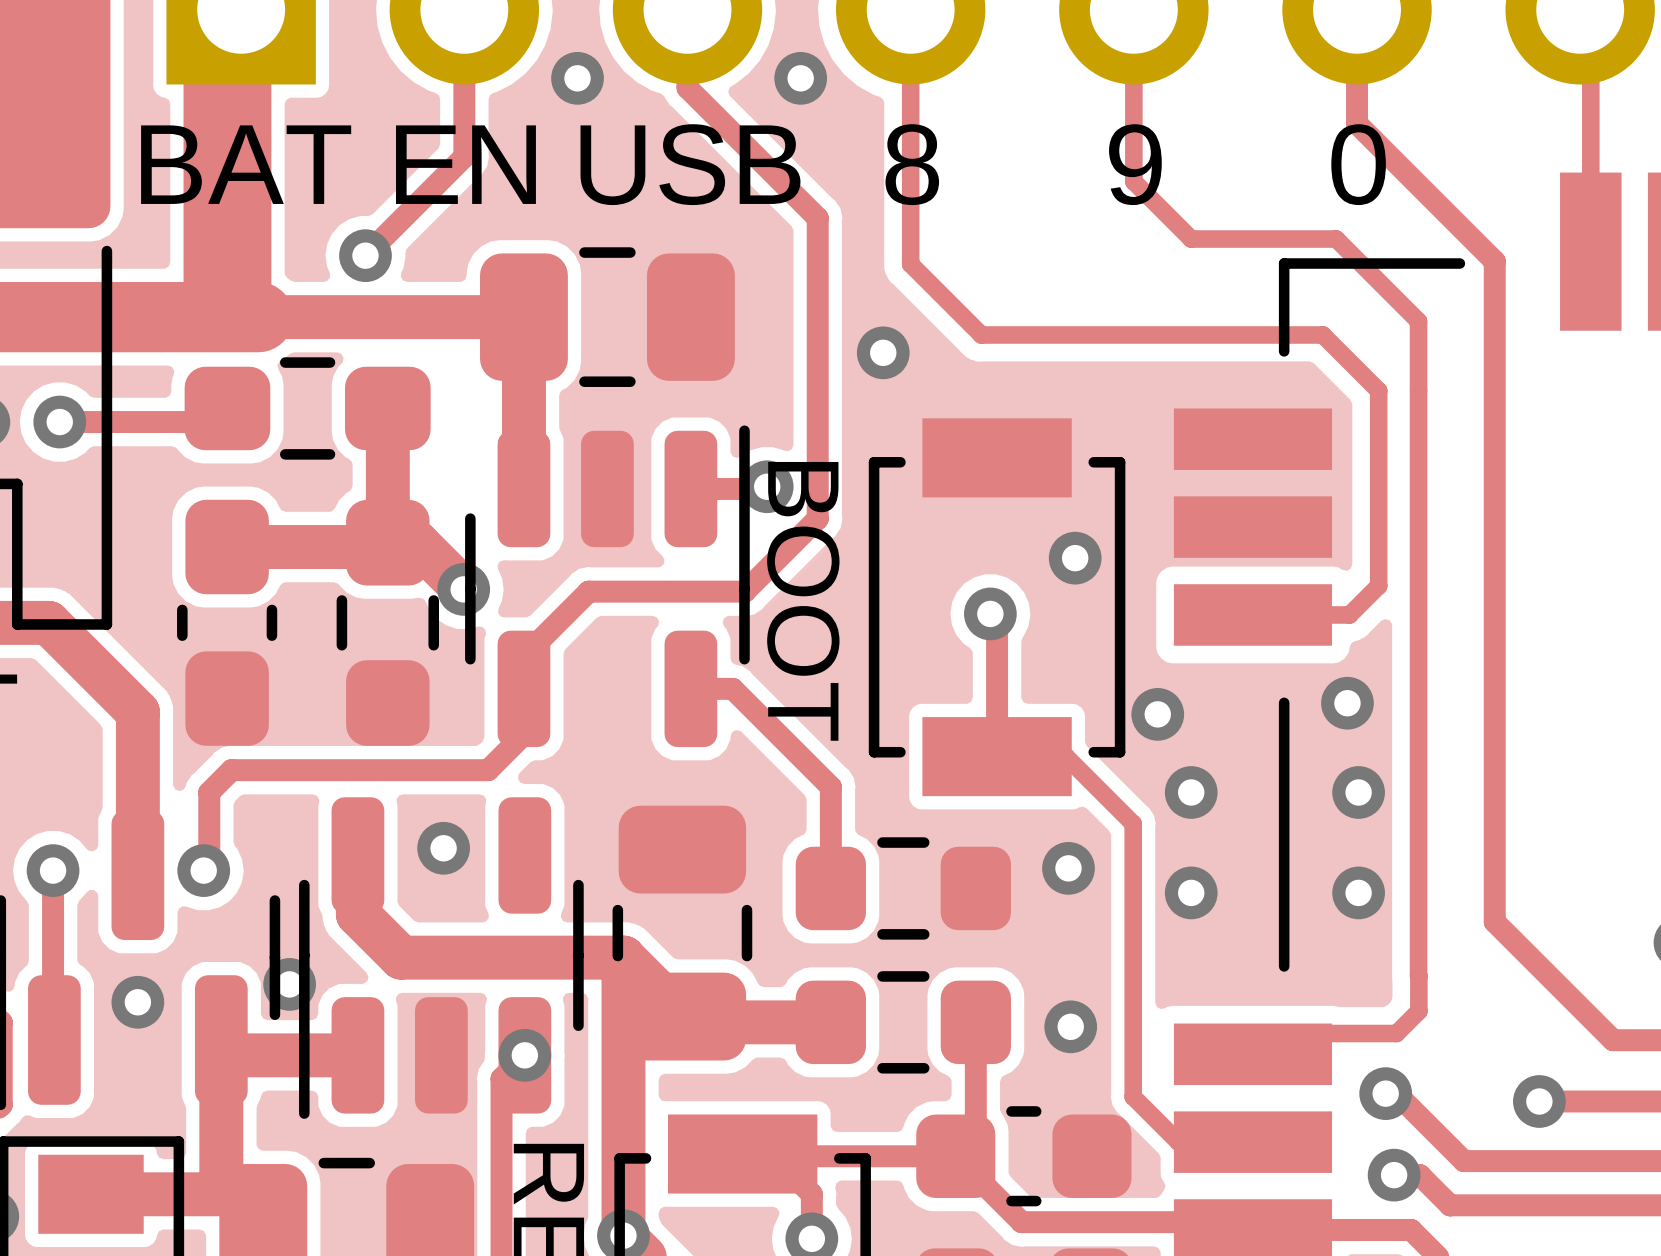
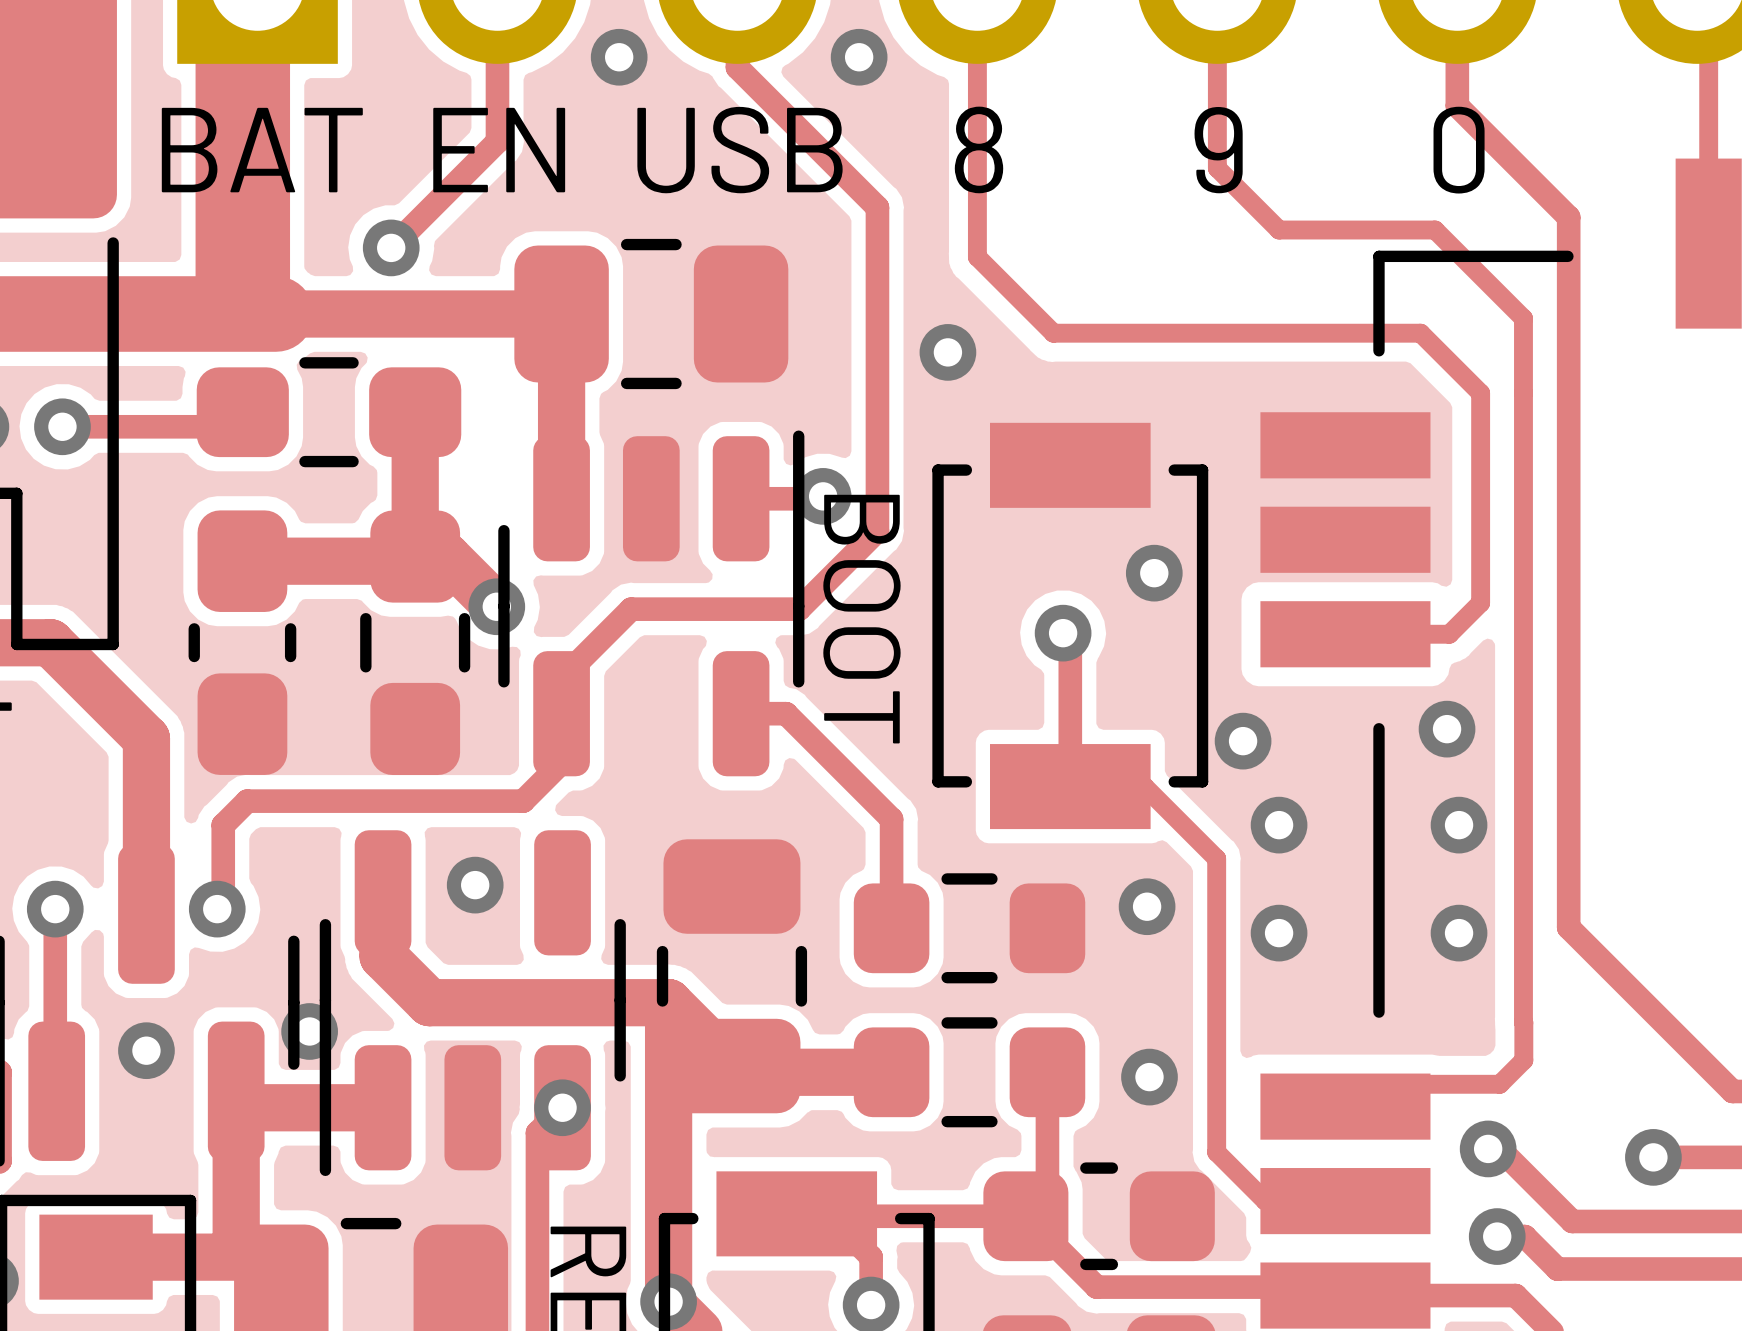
track: (1460, 227) (1494, 261) (1494, 921) -> (1568, 217) (1568, 927) (1605, 964)

